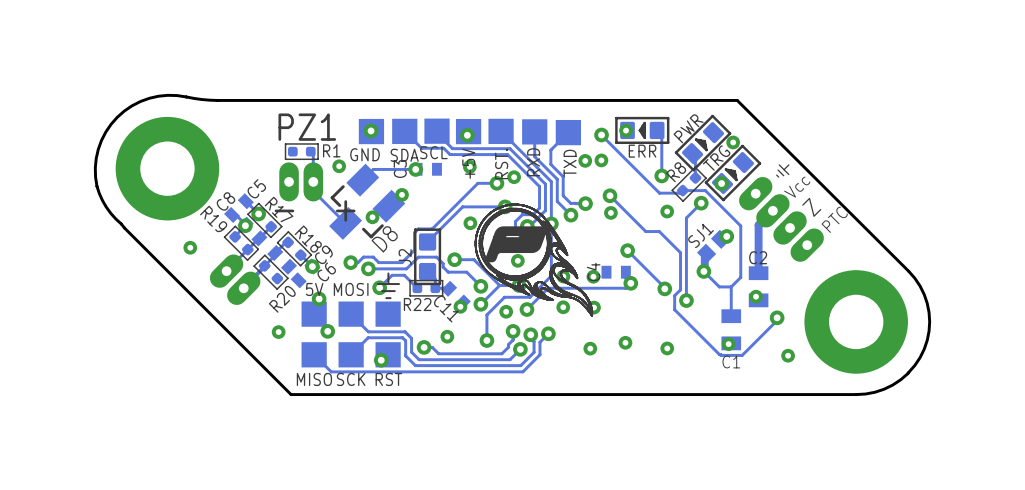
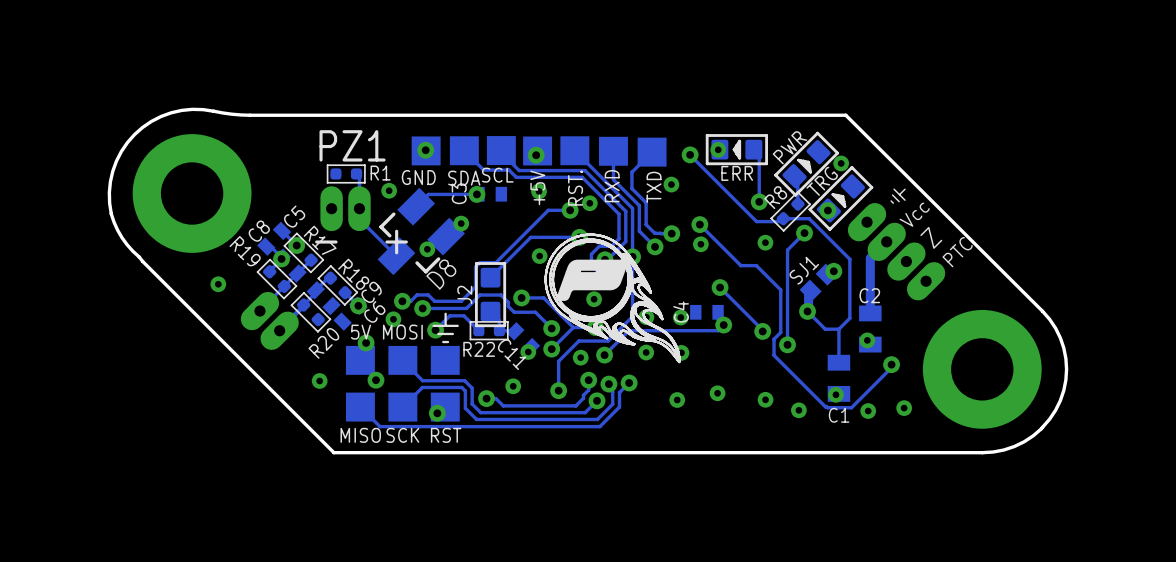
via: (601, 160) -> none
via: none -> (393, 319)
via: none -> (798, 410)
via: none -> (868, 411)

